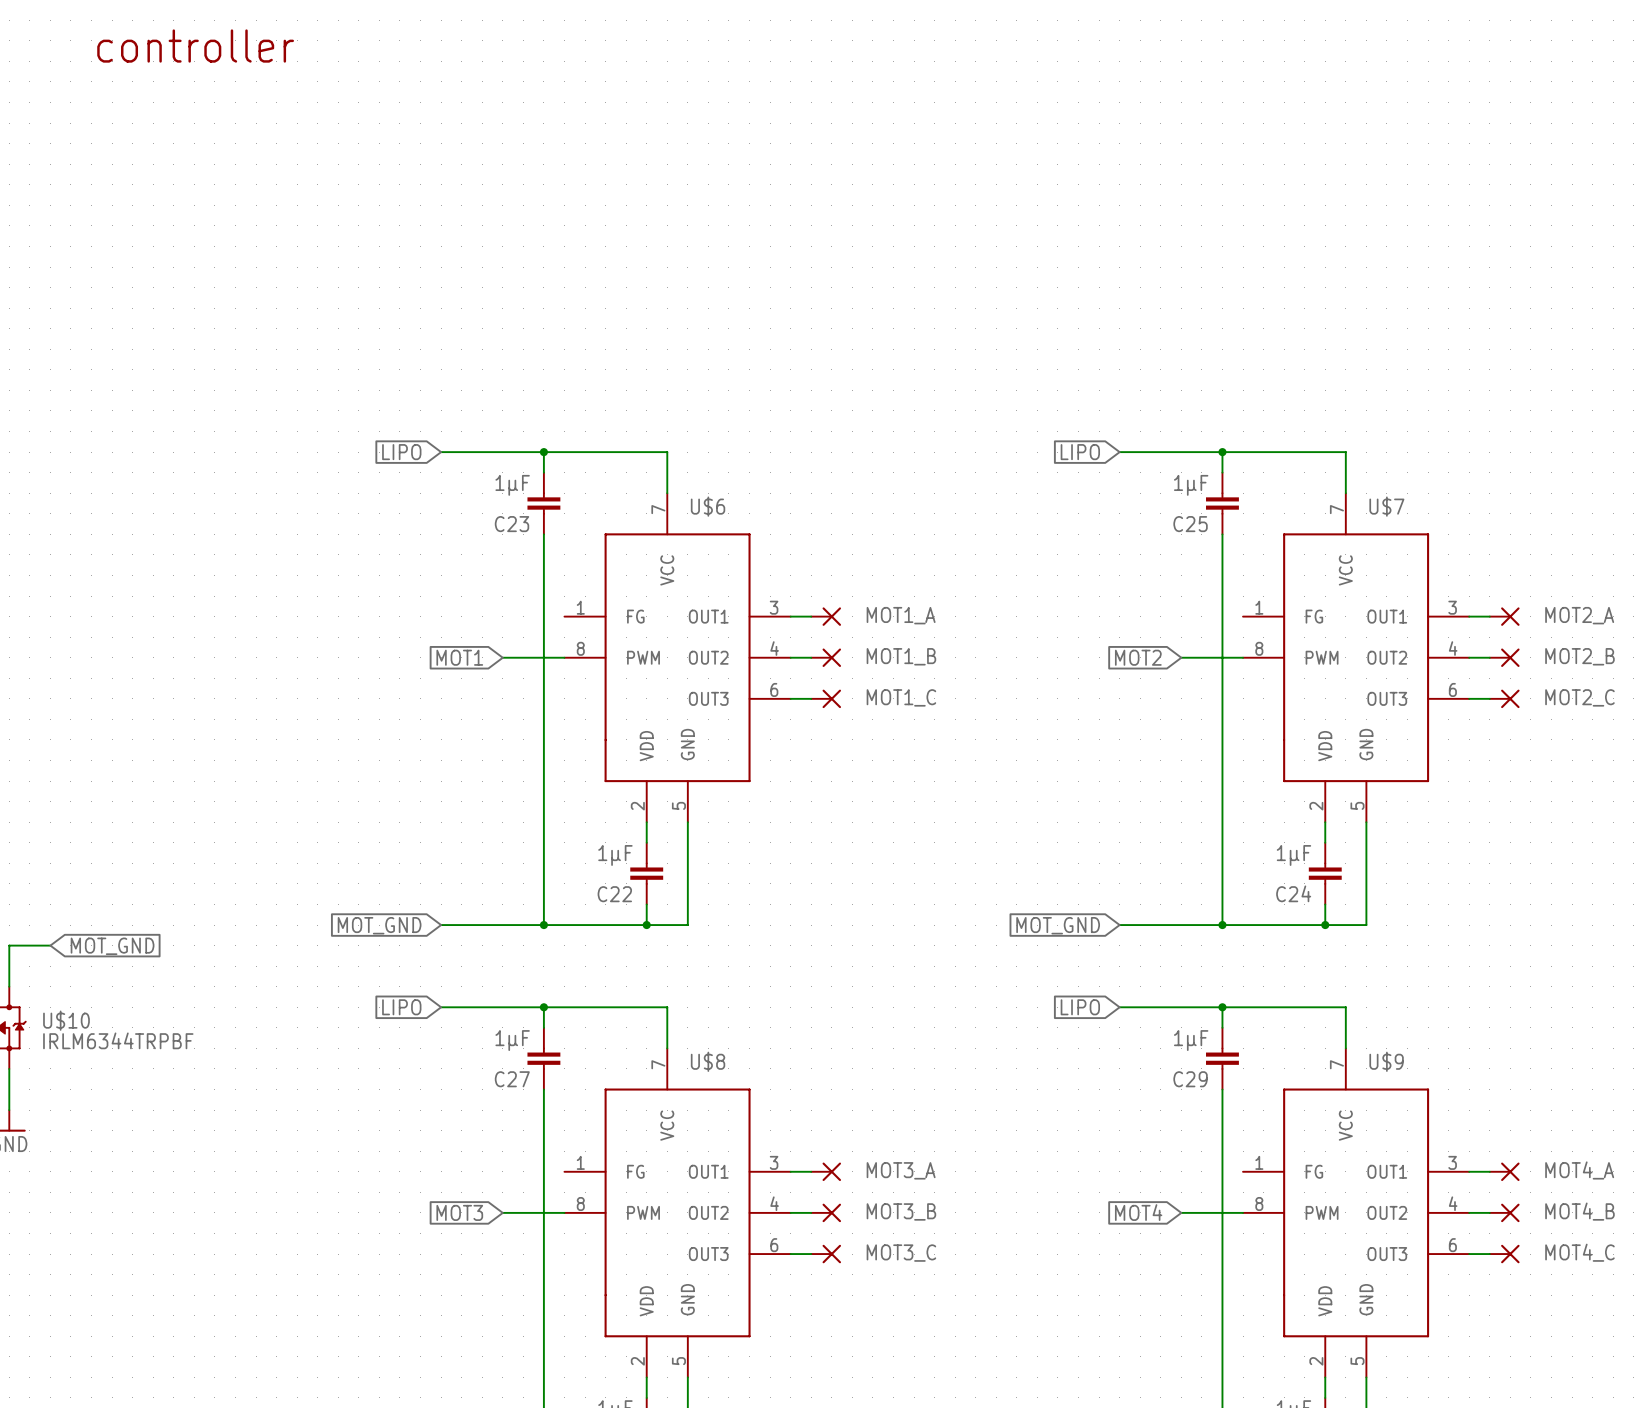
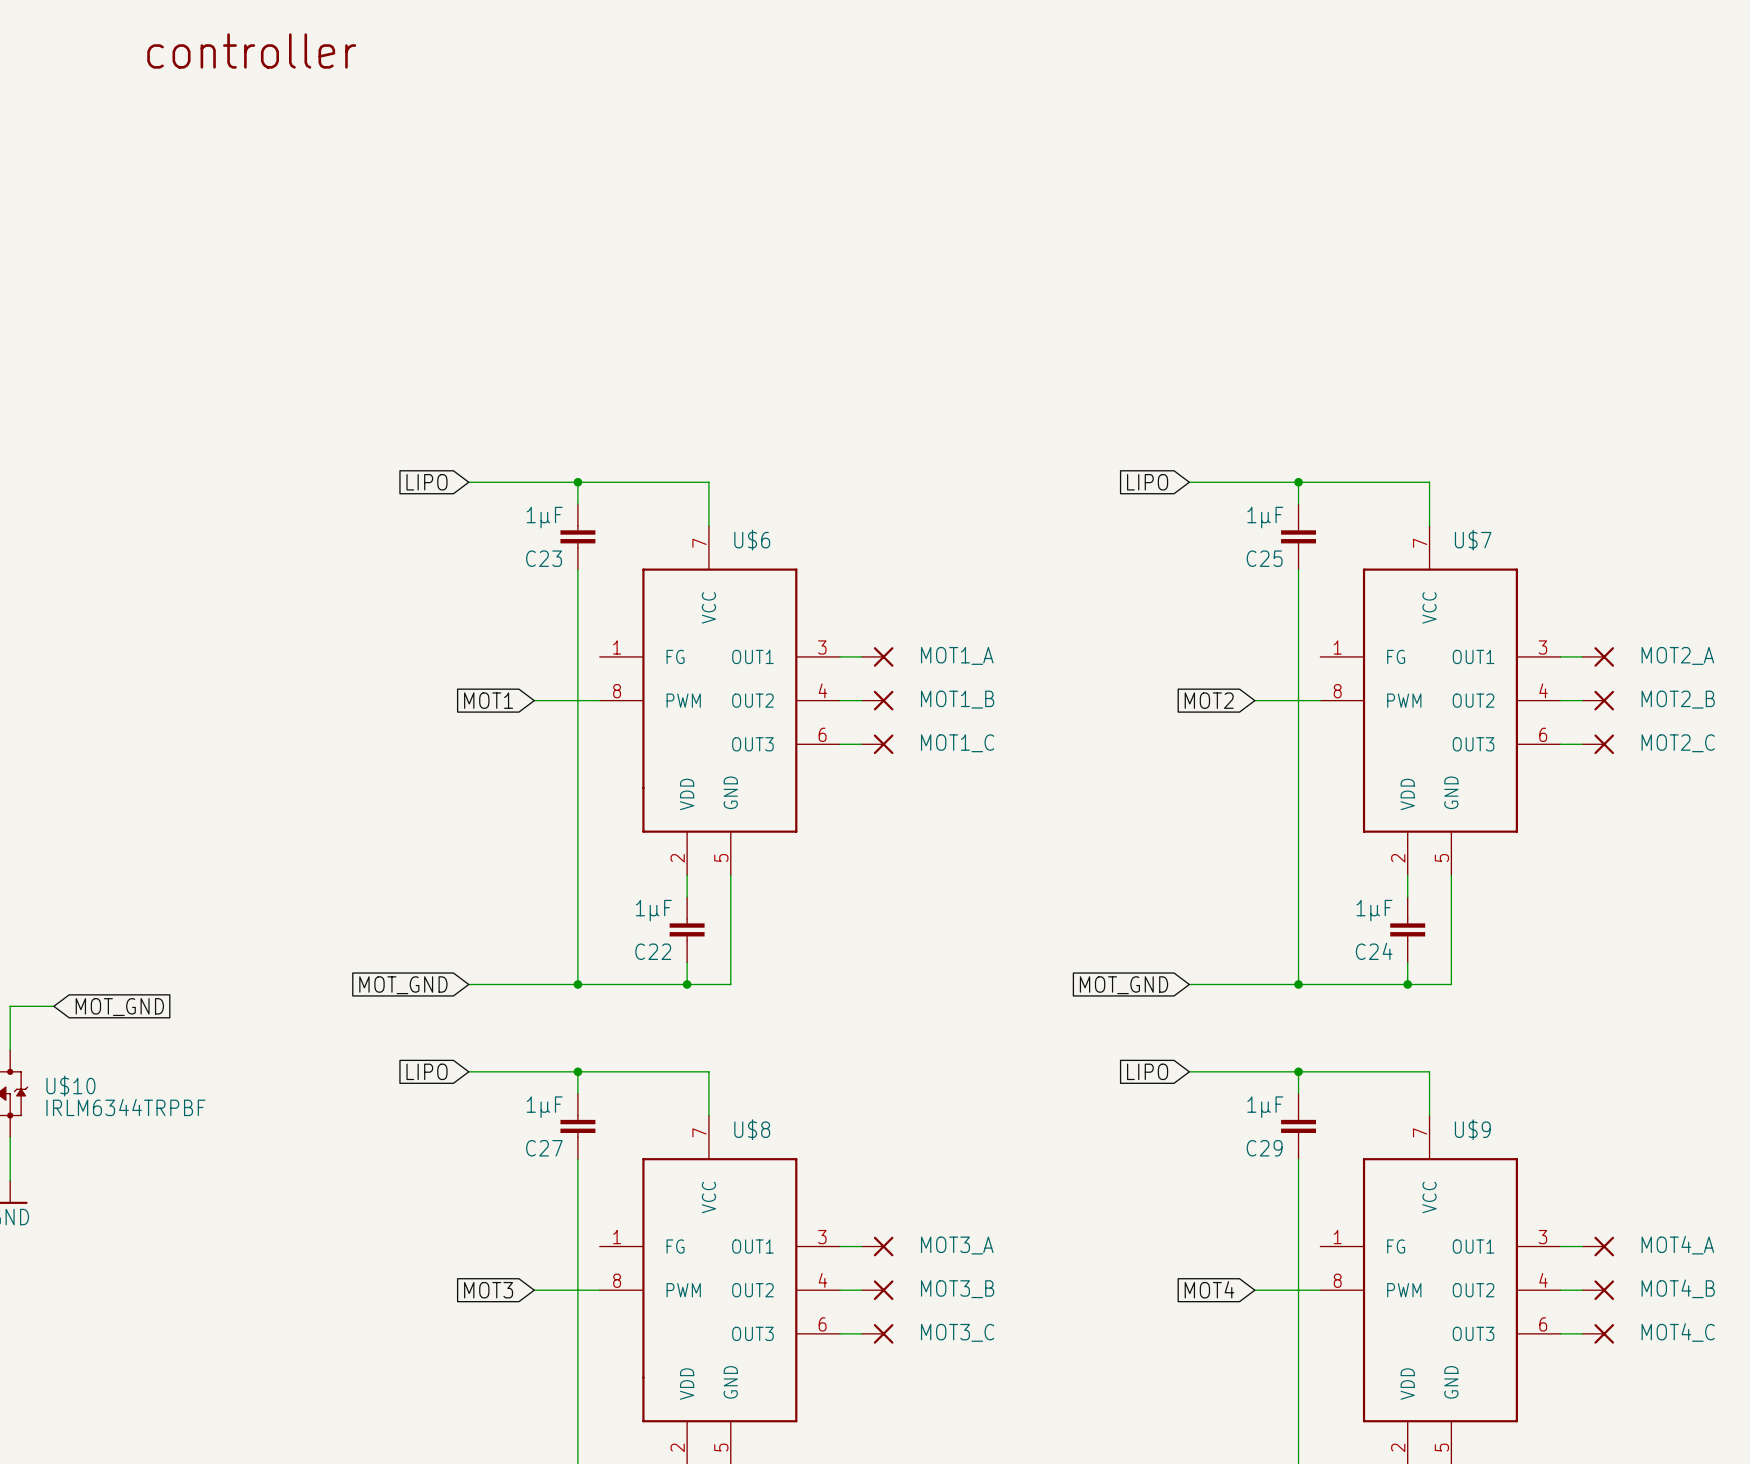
text position: controller (195, 46) -> controller (251, 50)

